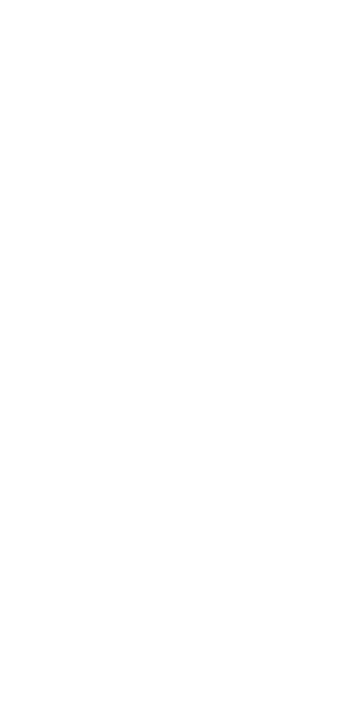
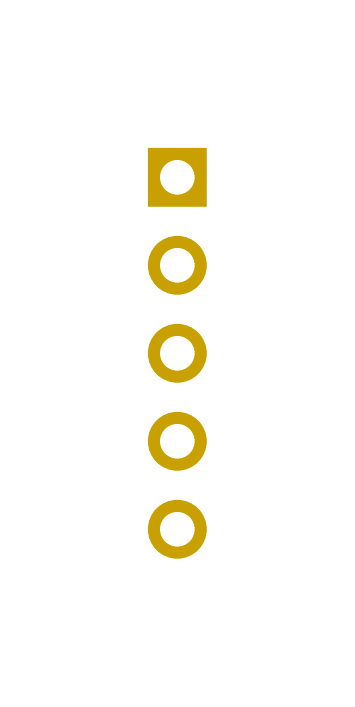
part: none -> (177, 353)

